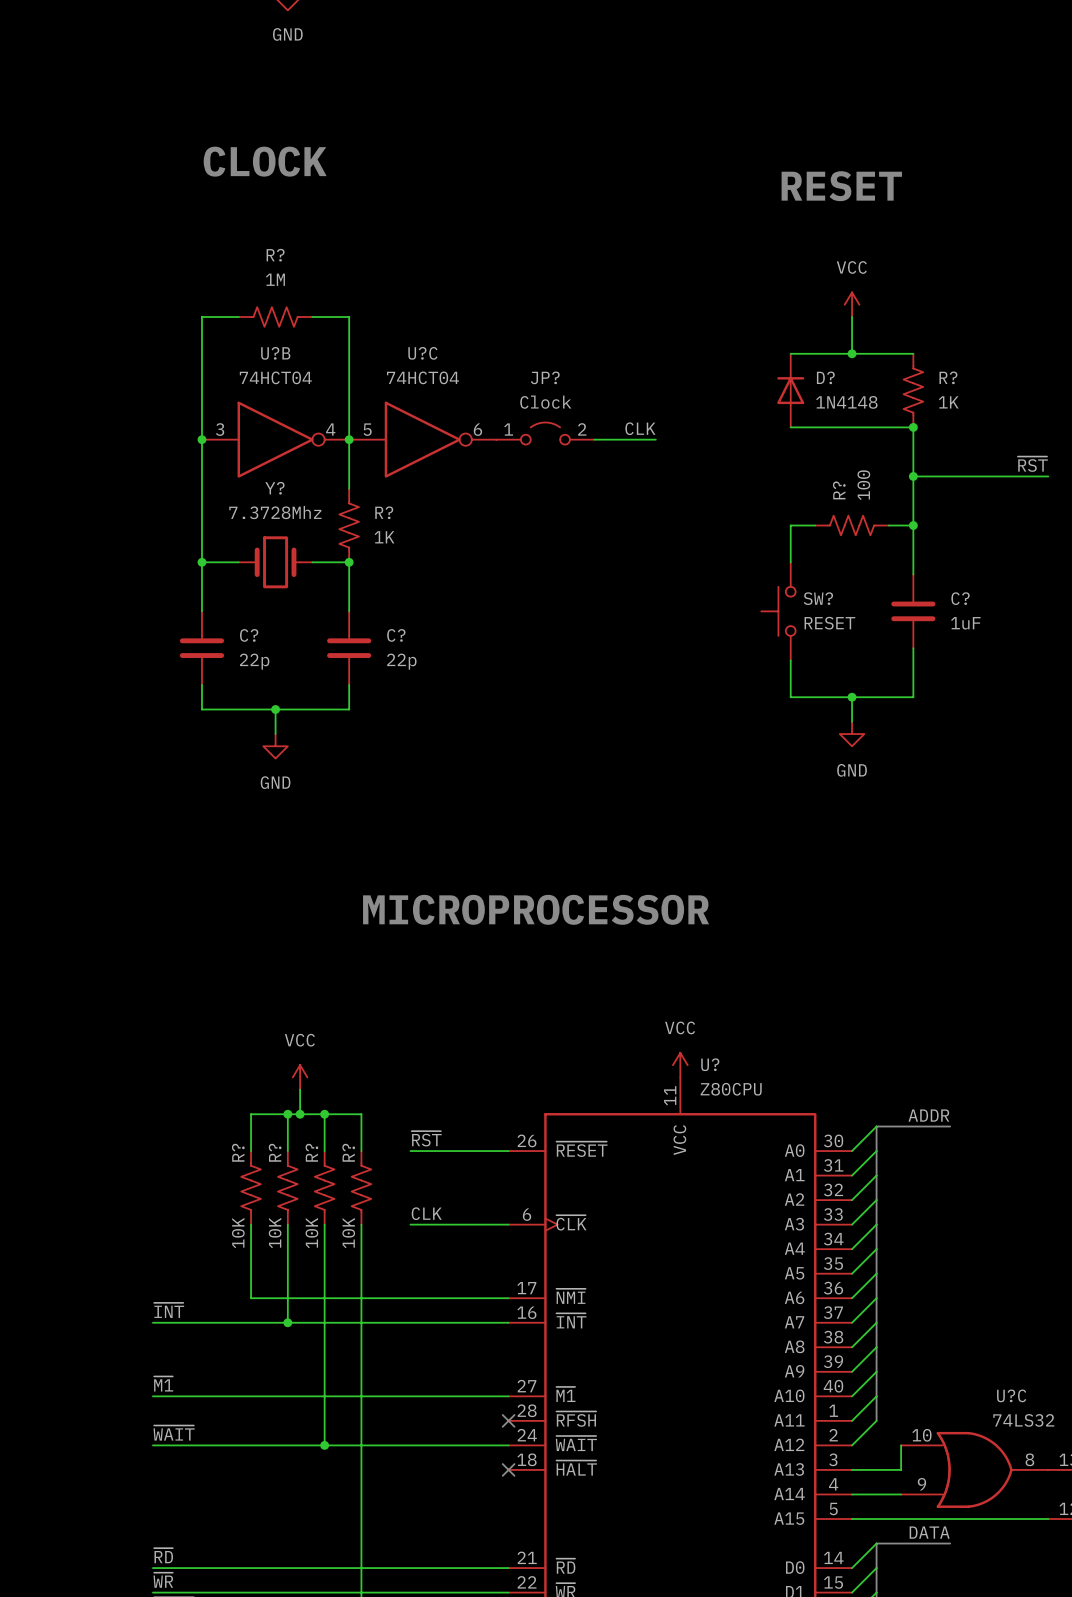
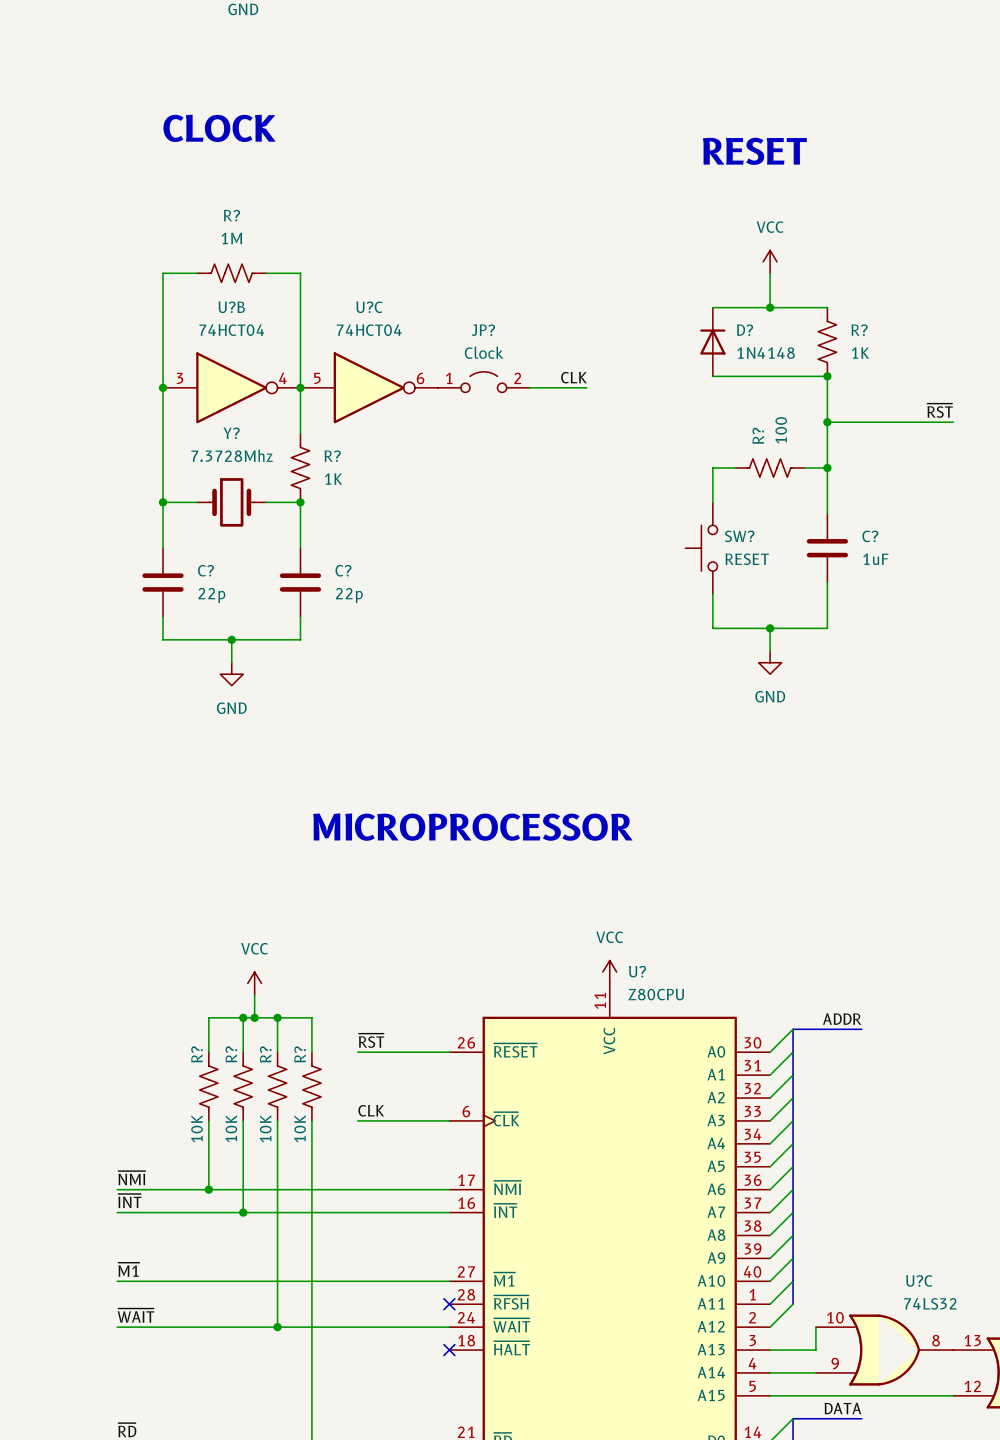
label: none -> ~{NMI} (131, 1178)
wire: none -> (117, 1189) (208, 1189)
junction: none -> (208, 1189)

